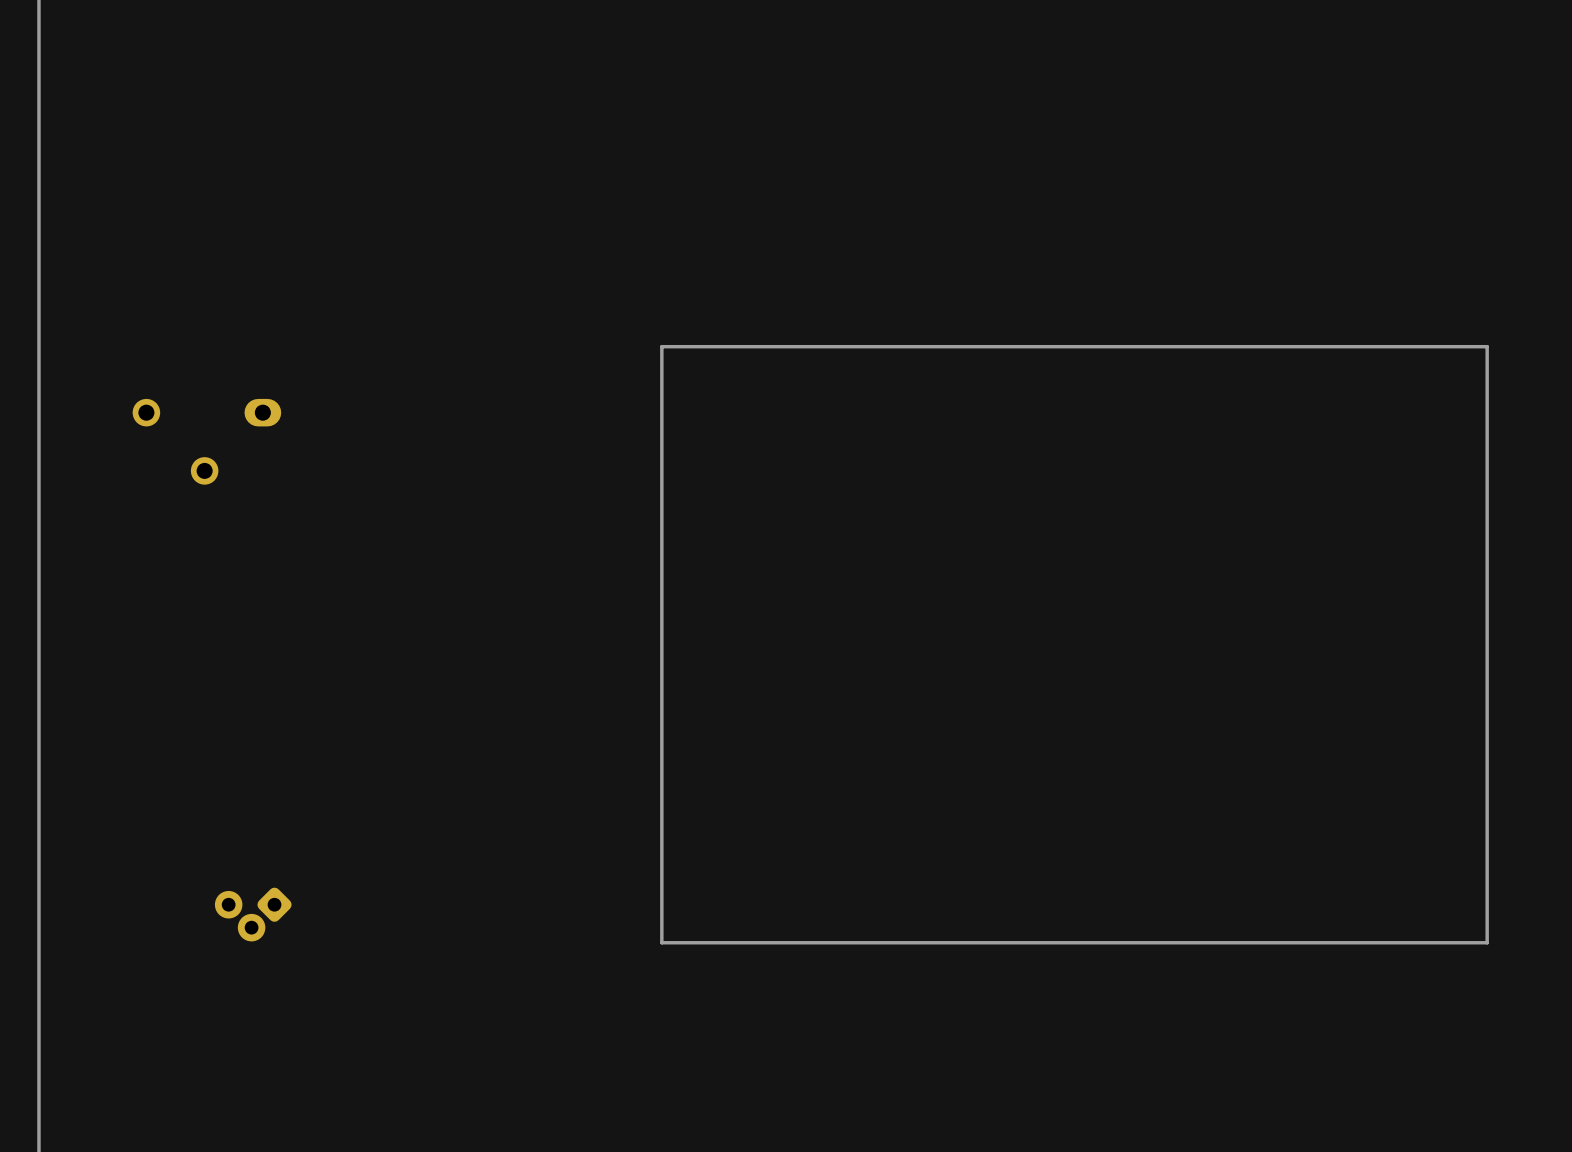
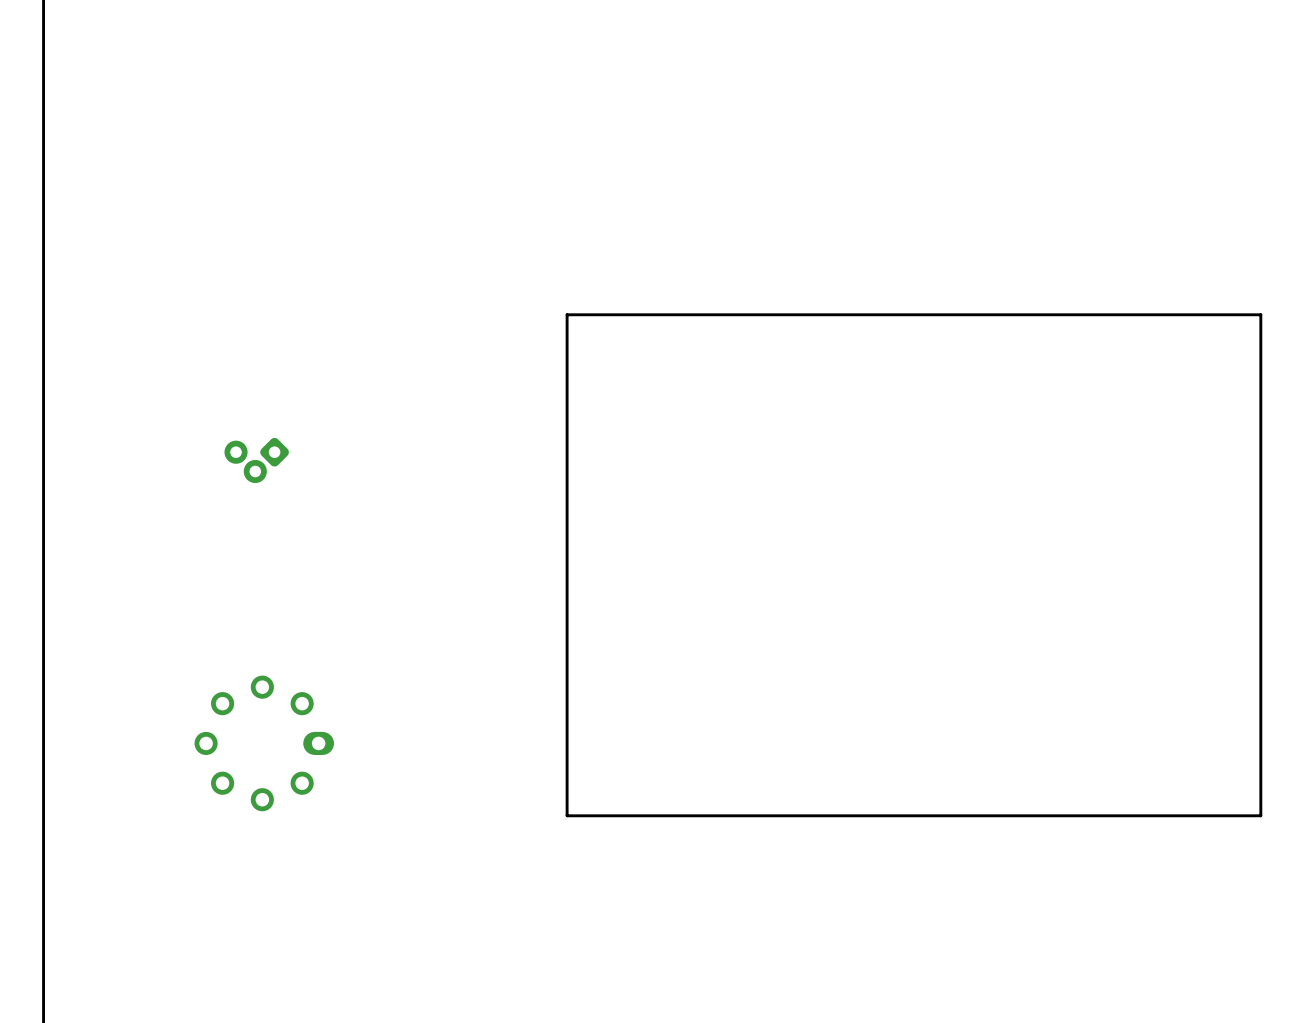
part: (206, 441) -> none
part: none -> (264, 743)
part position: (253, 914) -> (256, 460)

